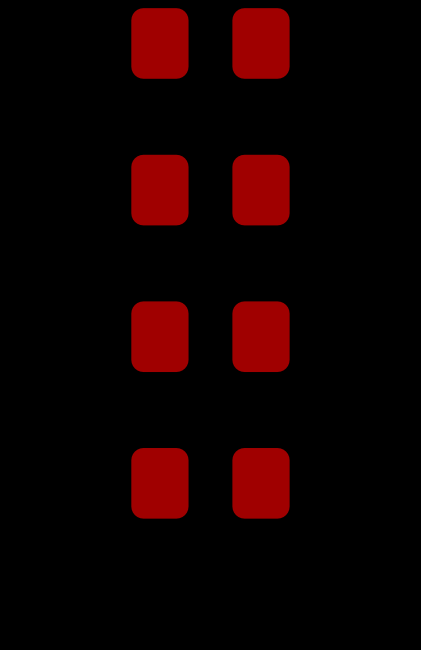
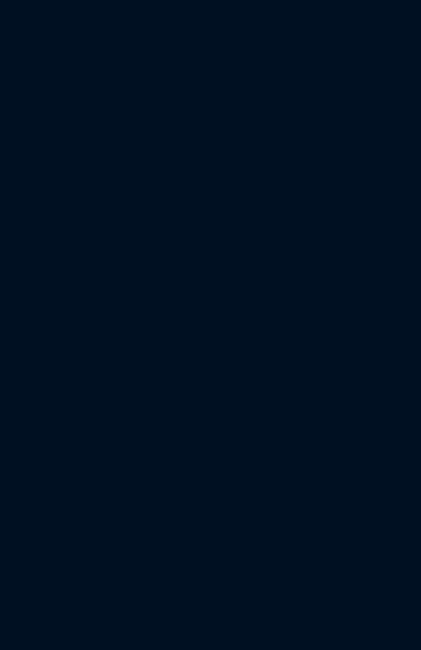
part: (210, 43) -> none
part: (210, 190) -> none
part: (210, 336) -> none
part: (210, 483) -> none

